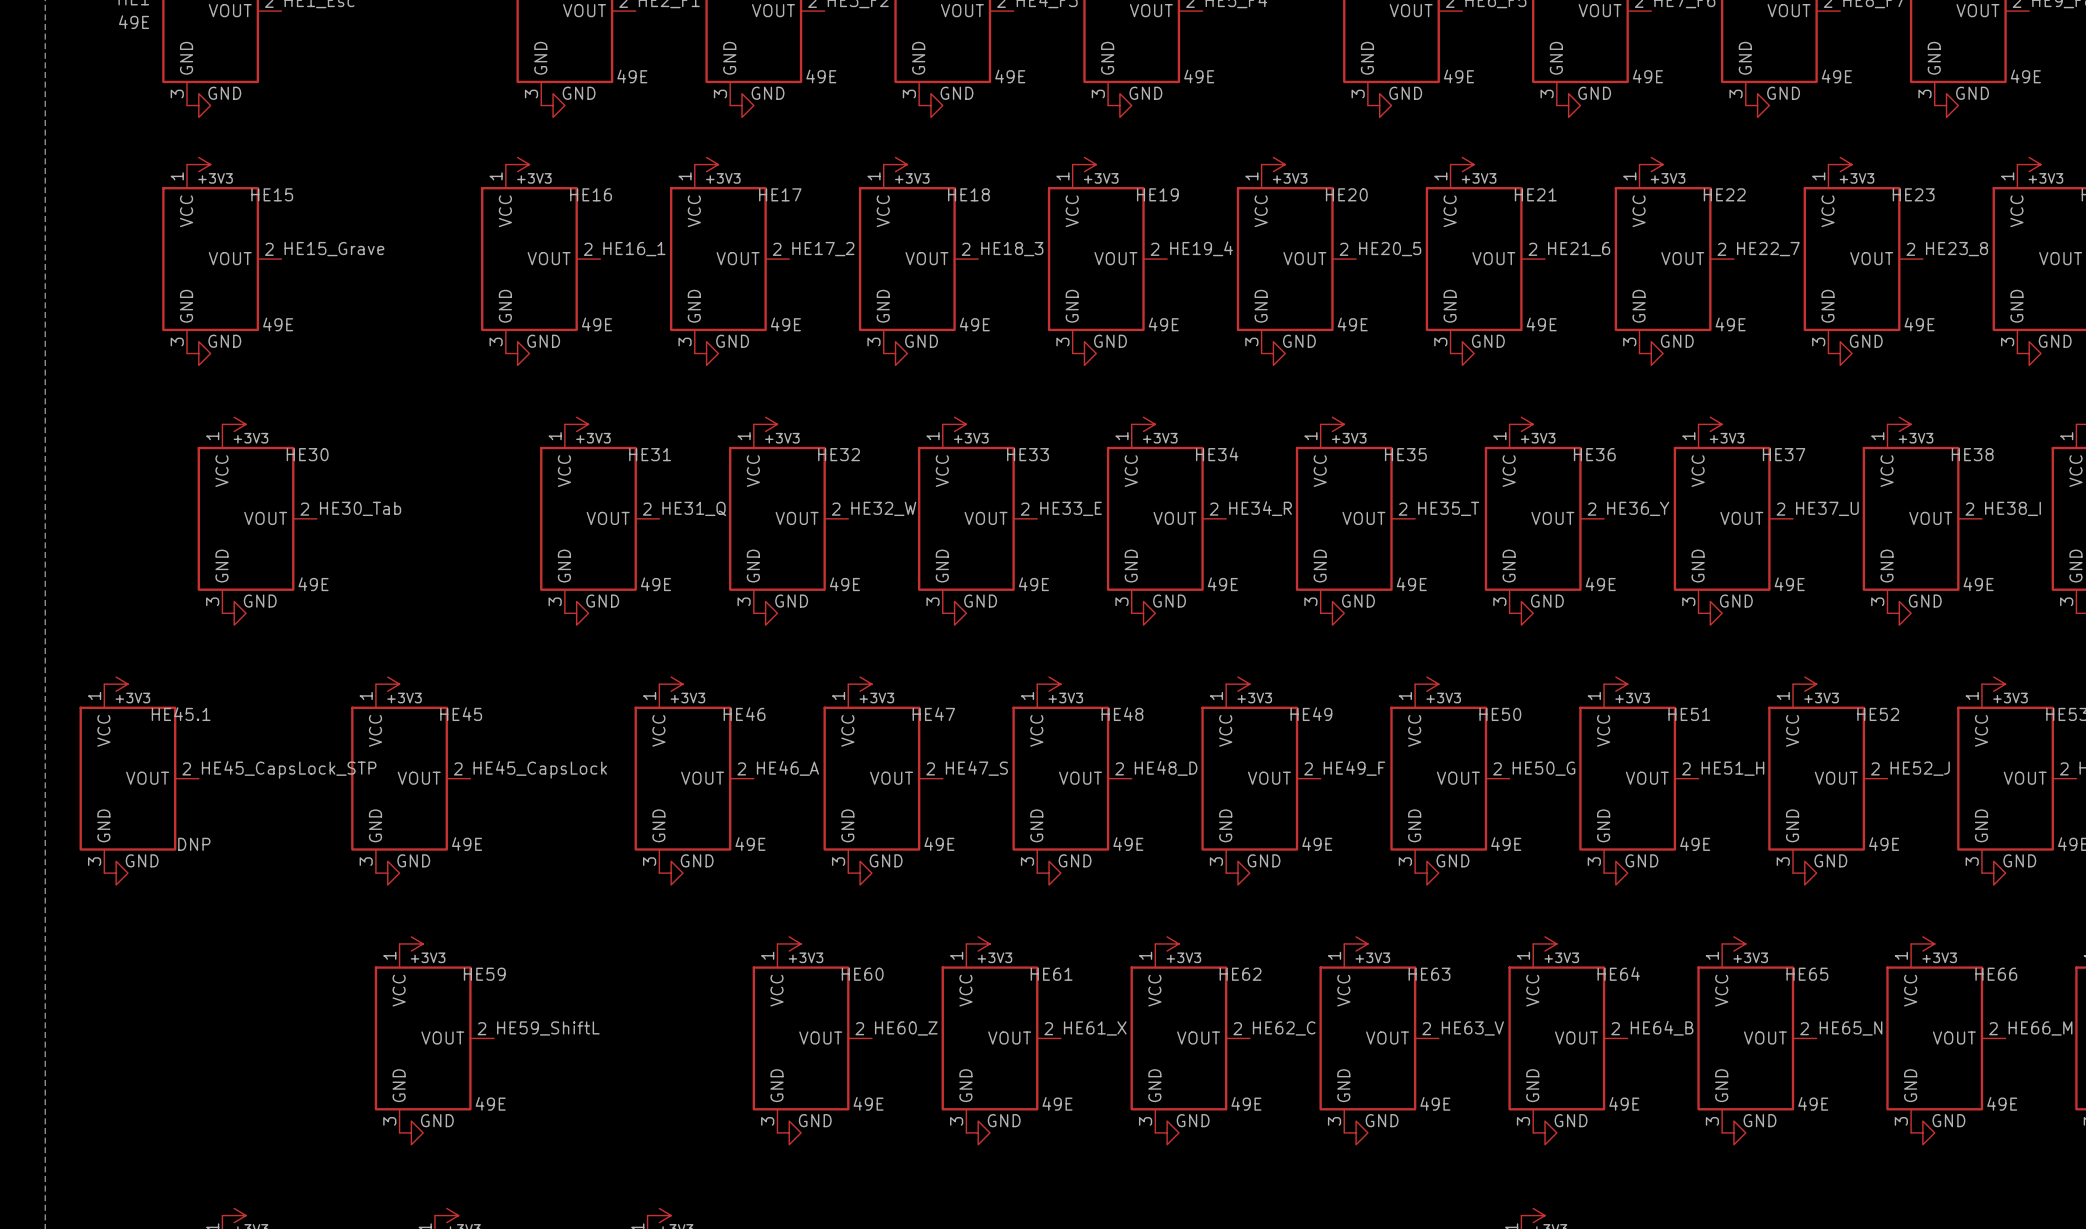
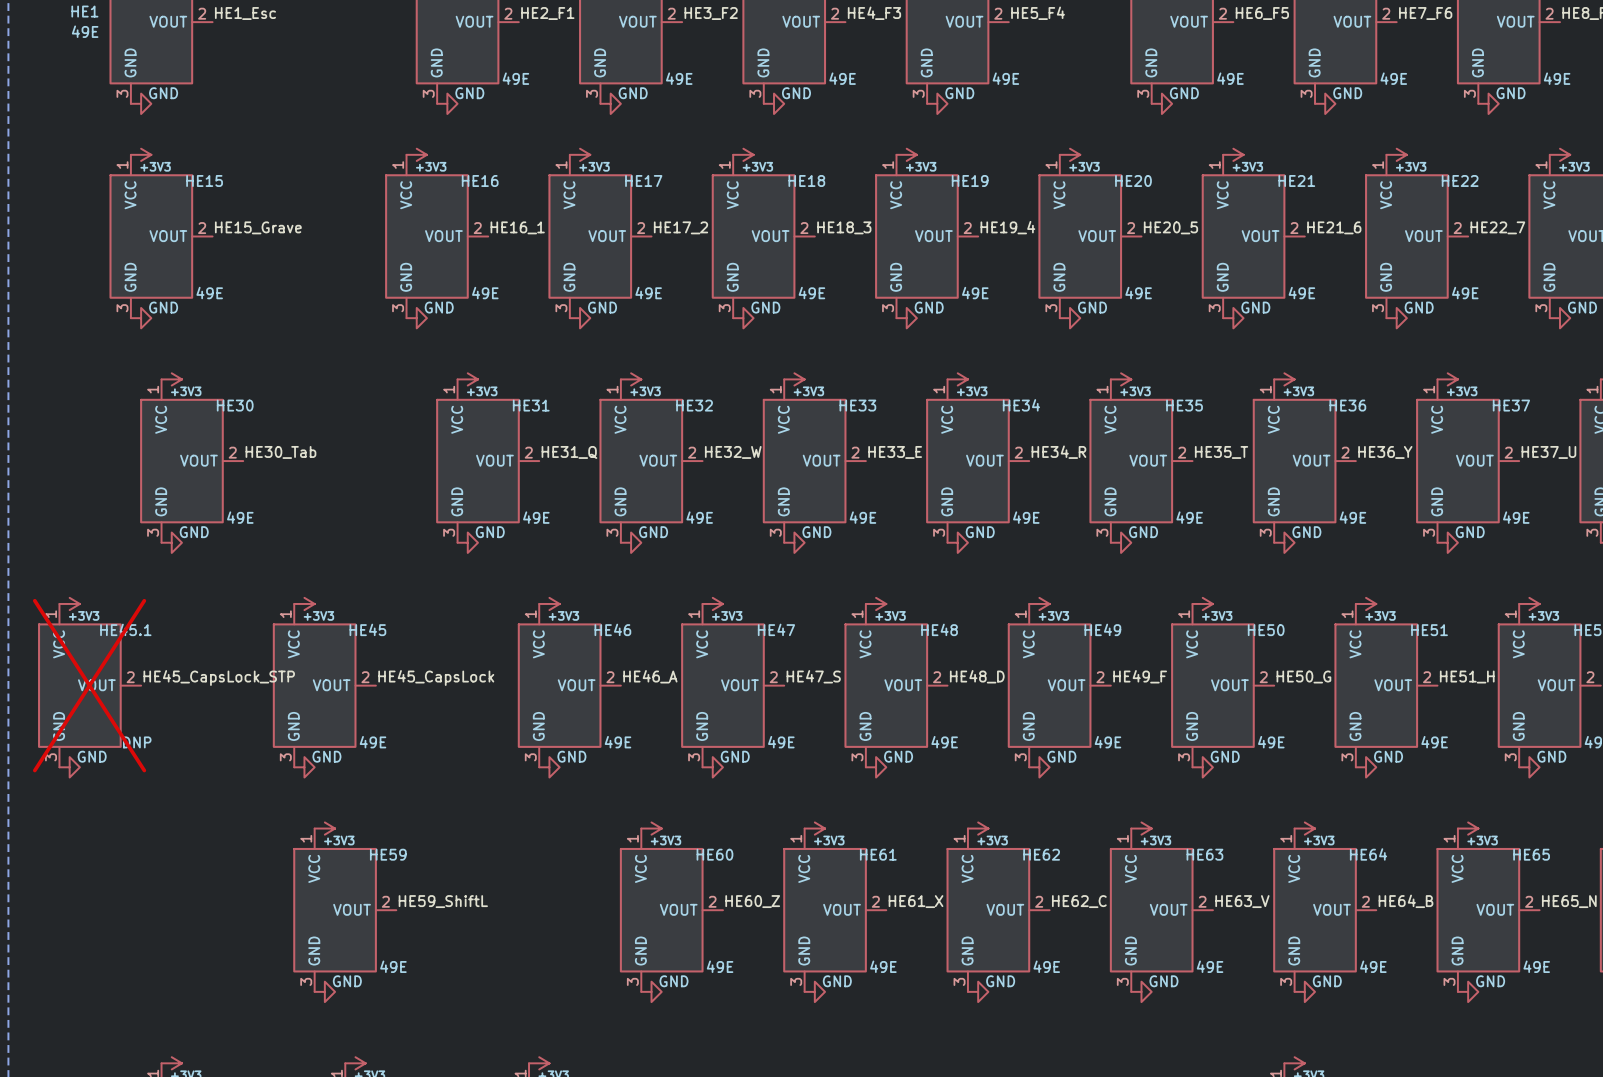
HE45.1 do-not-place cross: none -> (89, 685)

